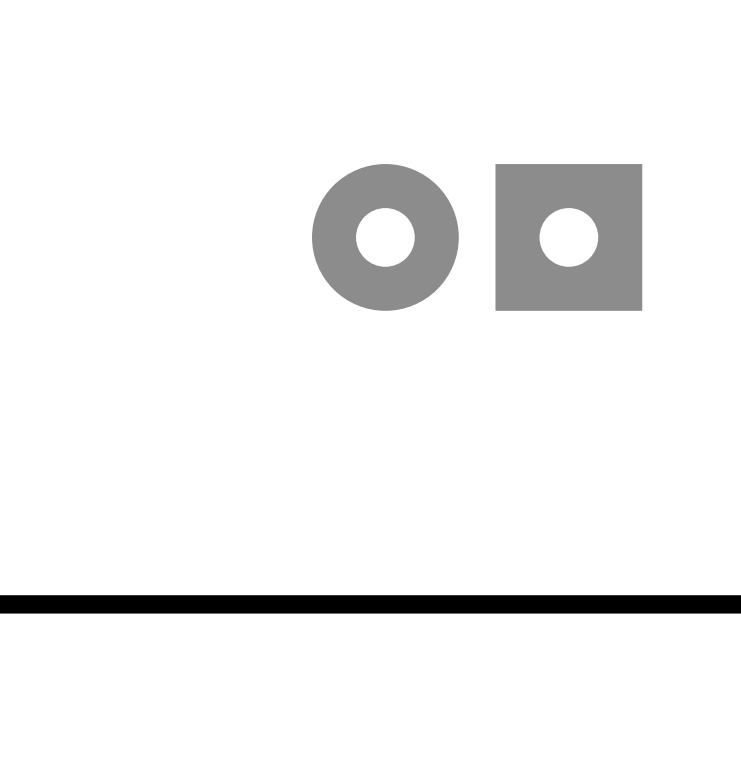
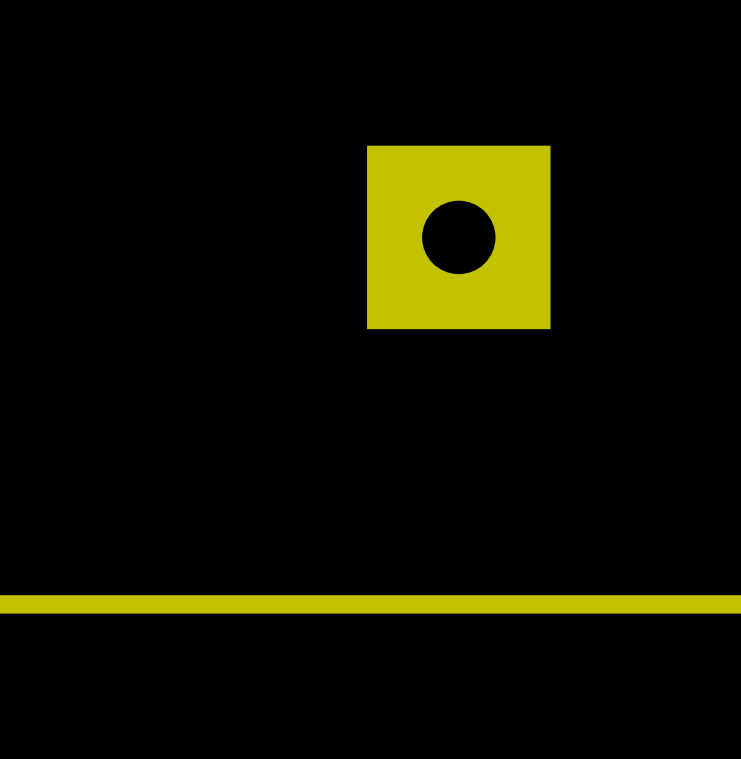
part footprint: [312, 164, 643, 311] -> [367, 145, 551, 330]

